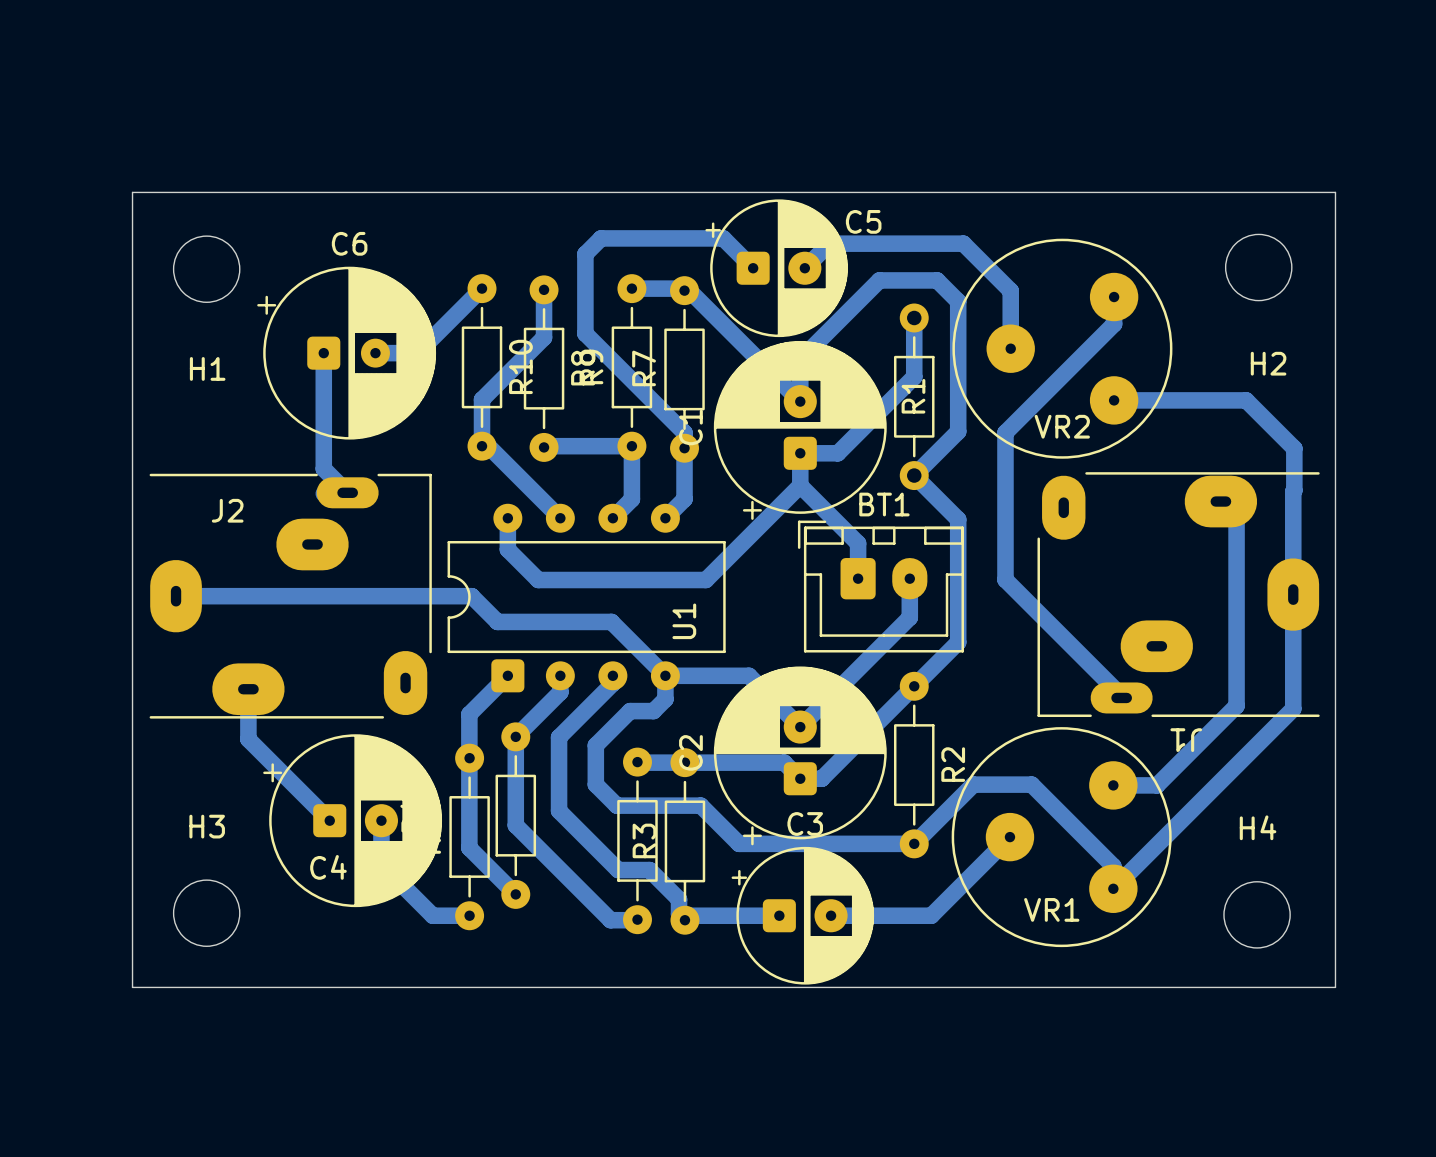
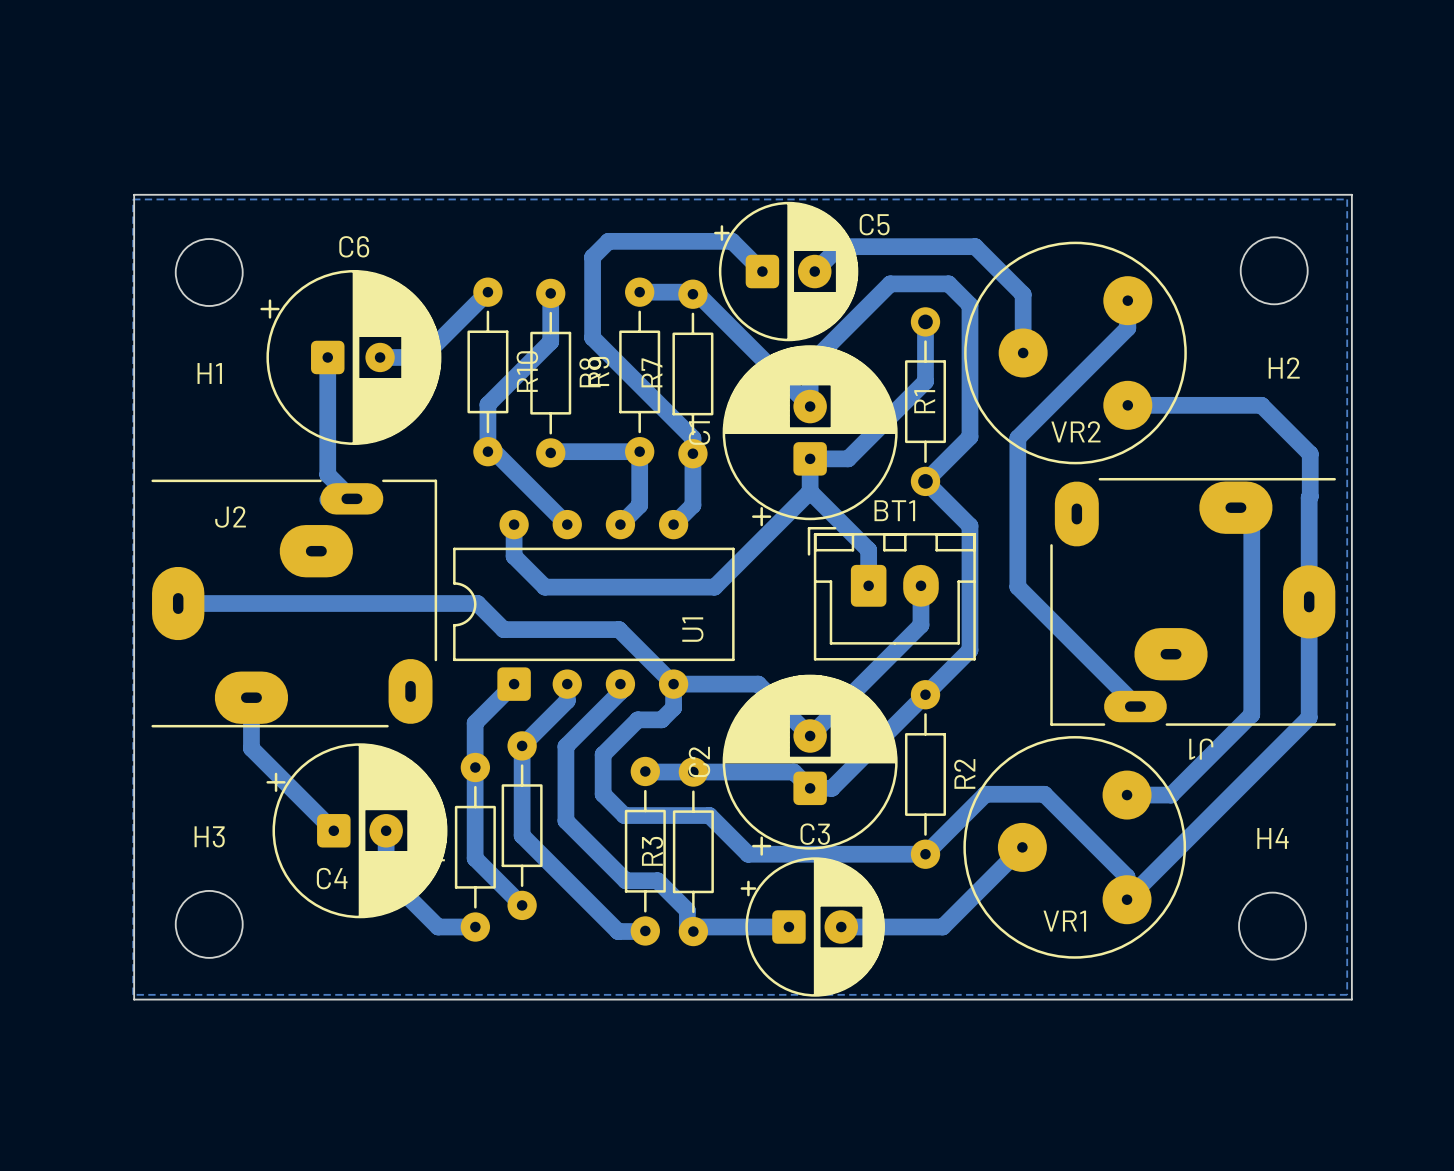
bottom zone outline: none -> (133, 199) (1347, 199) (1347, 994) (133, 994) (133, 199)

